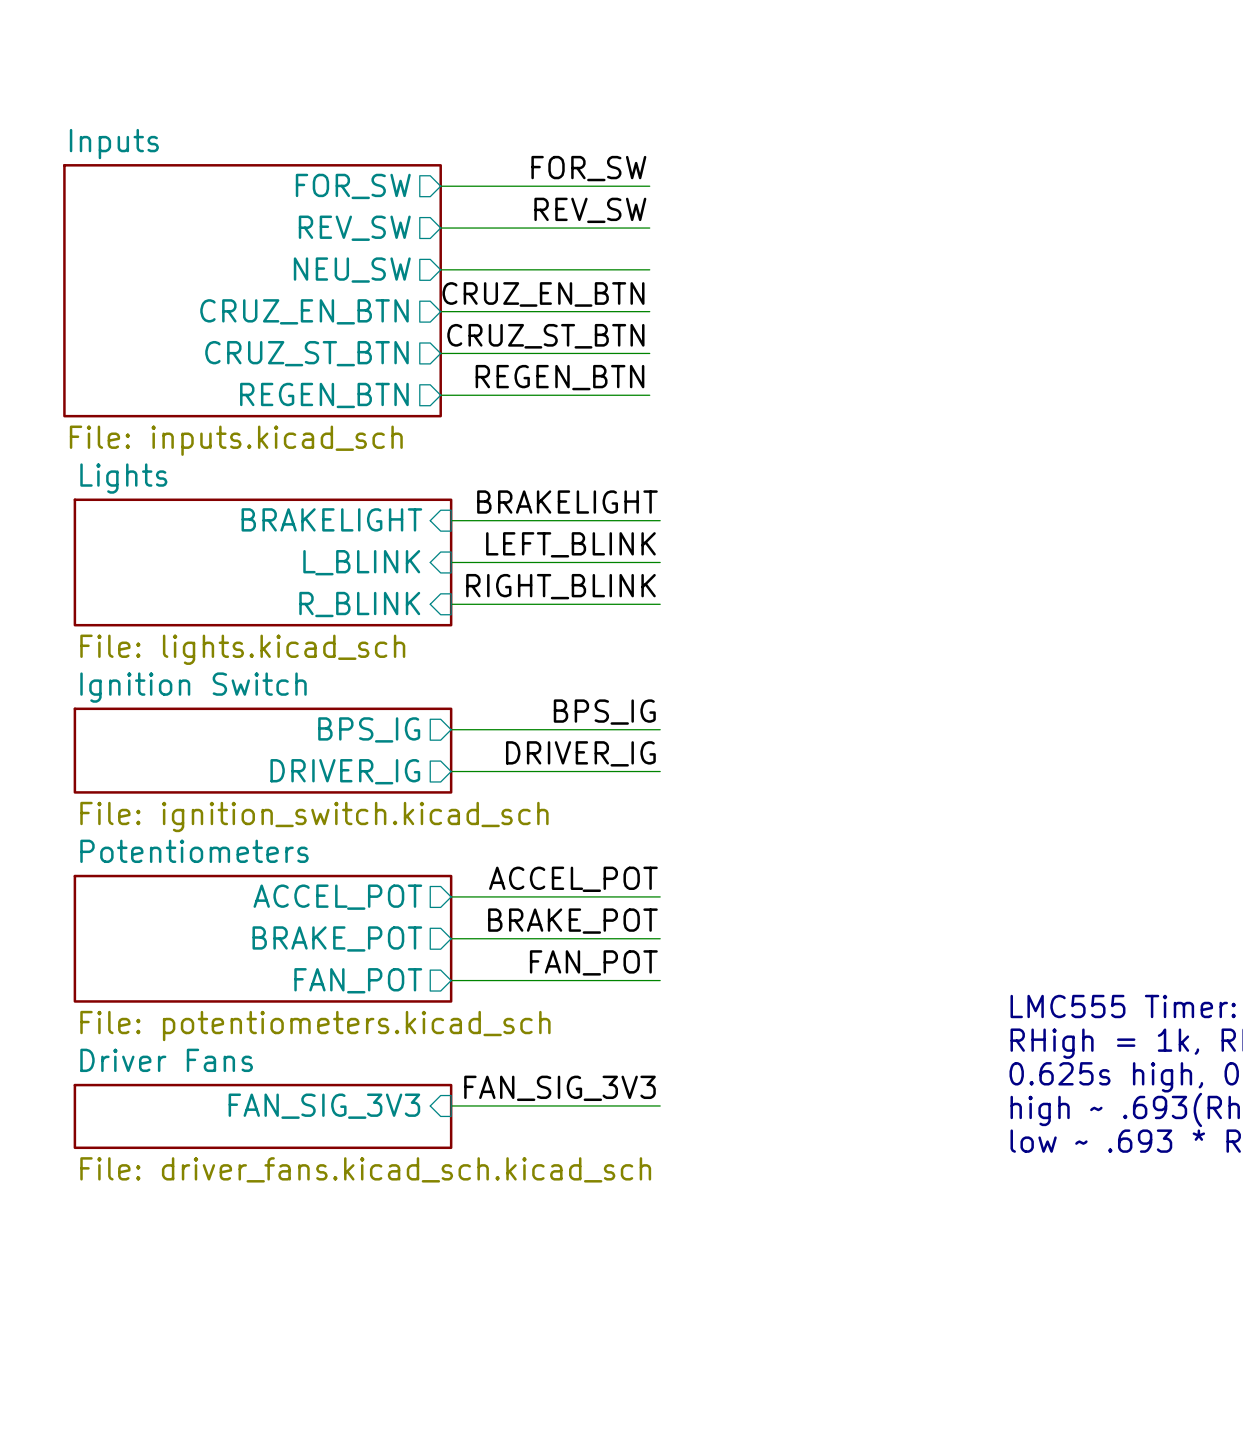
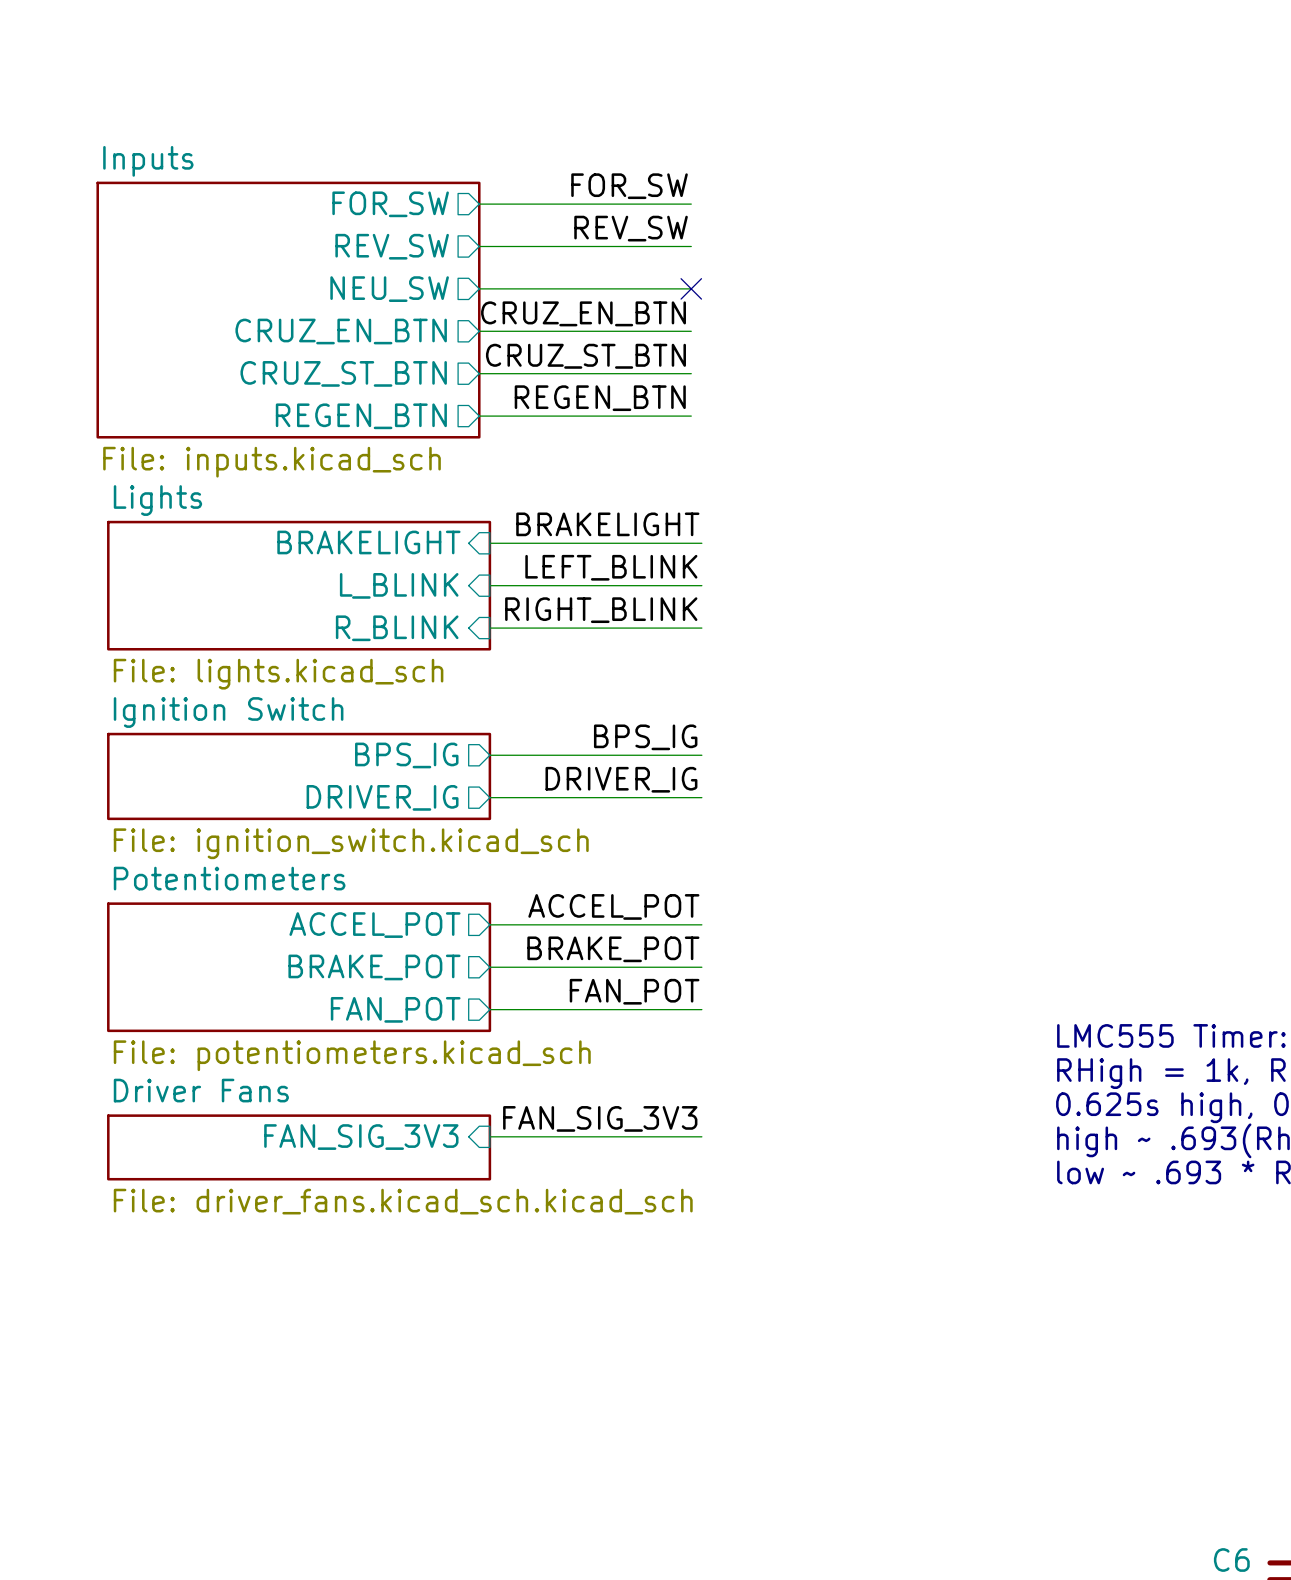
no-connect mark: none -> (691, 288)

